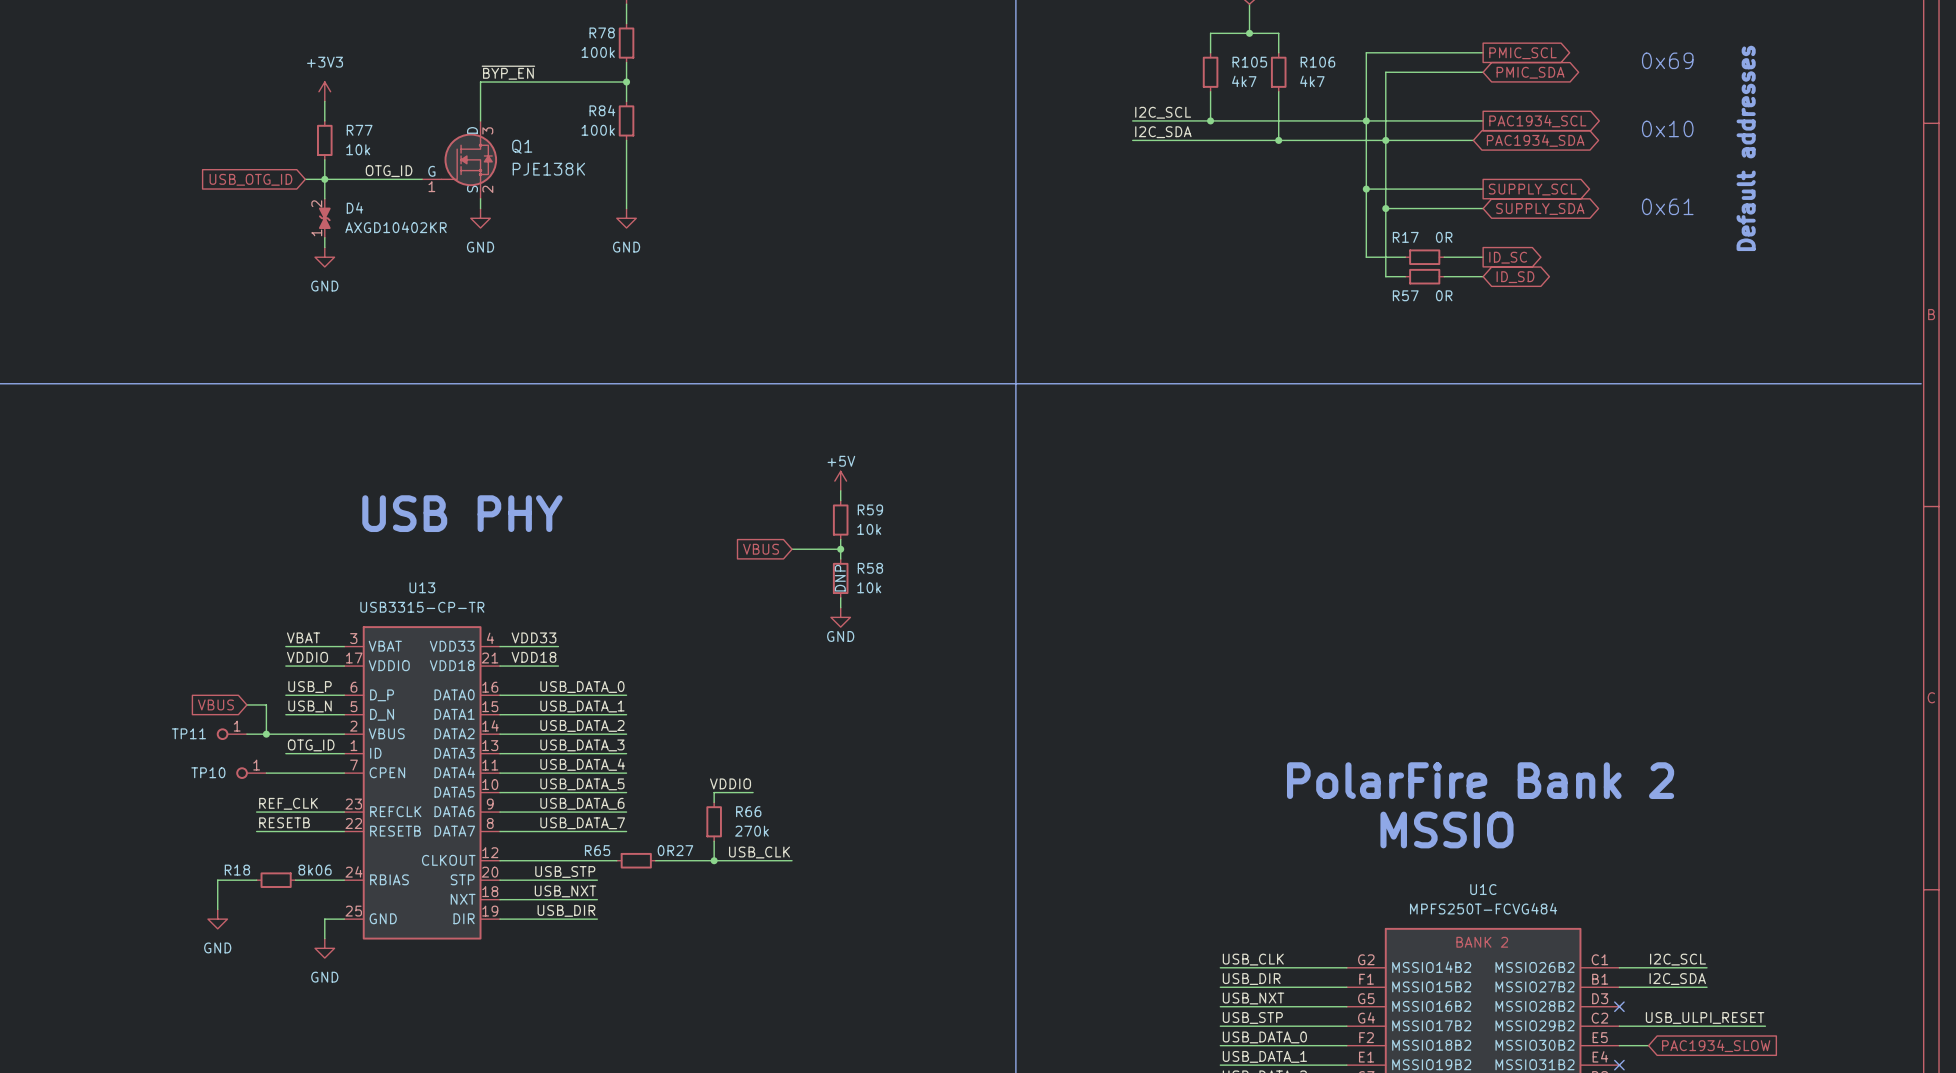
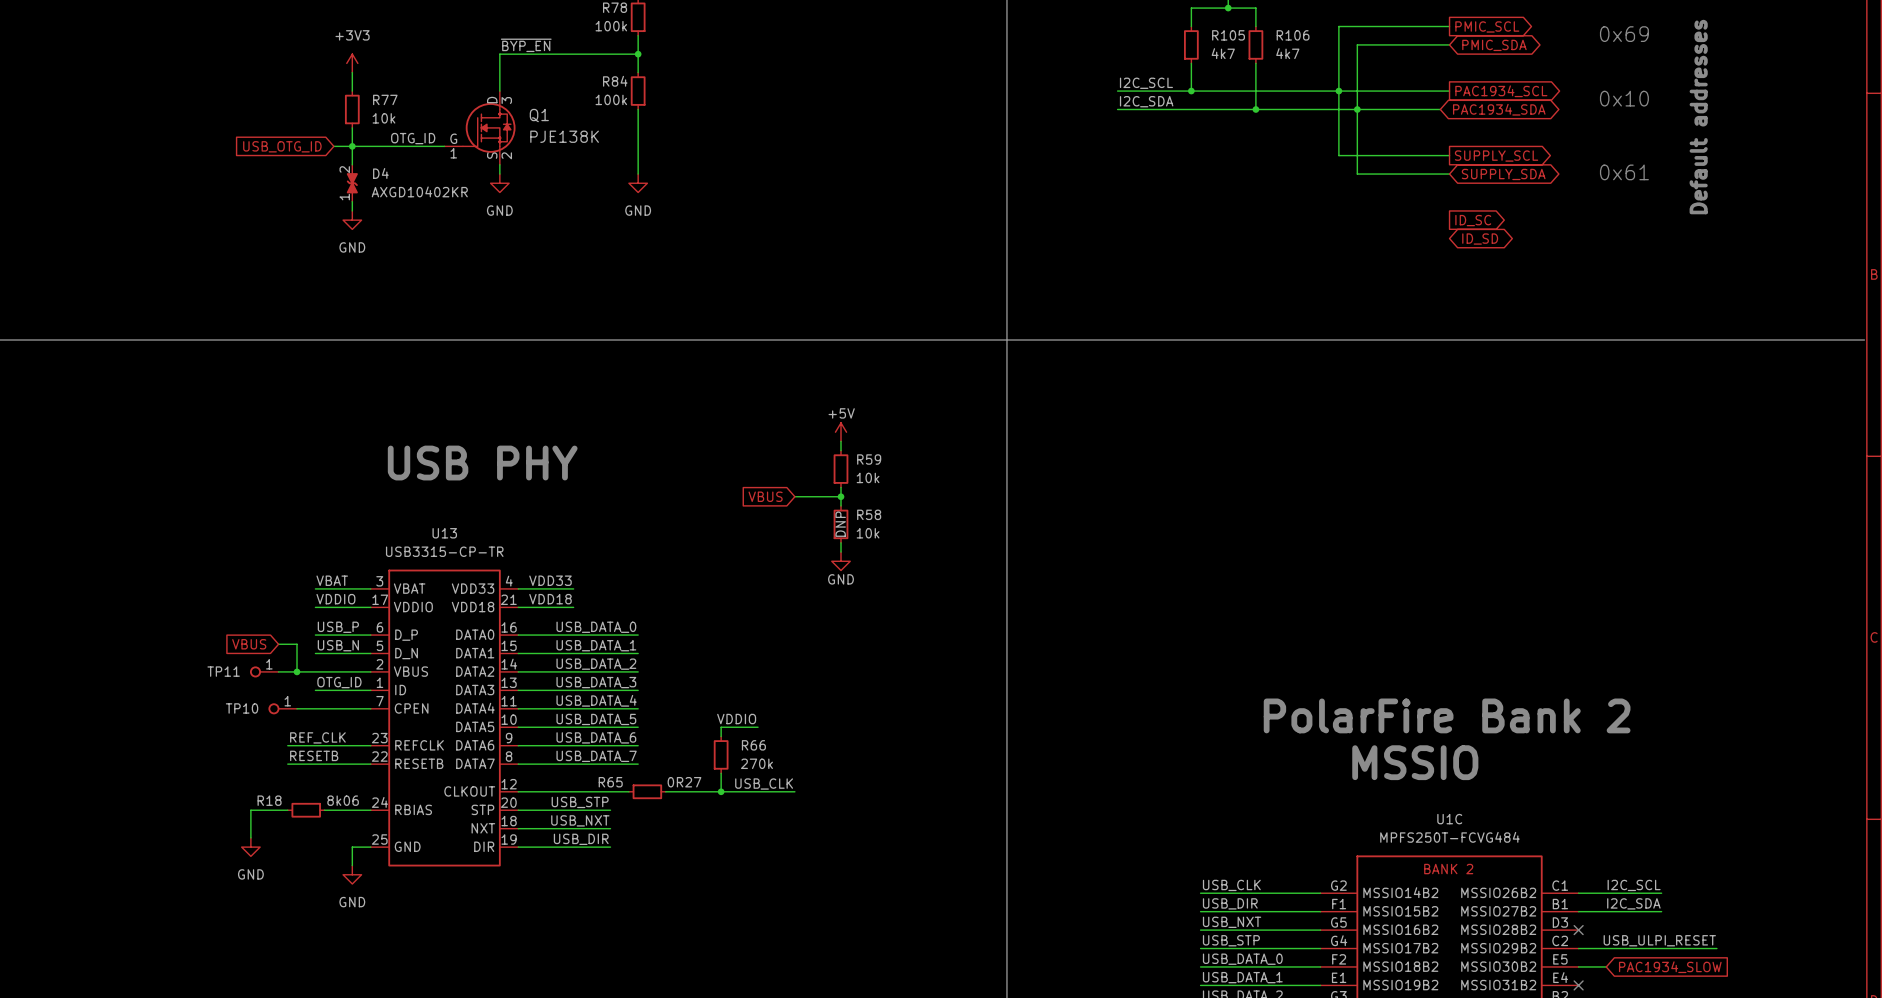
wire: (1366, 189) (1366, 257) (1405, 257) -> none
junction: (1366, 189) -> none
wire: (1385, 208) (1385, 276) (1405, 276) -> none
junction: (1385, 208) -> none
R17: (1424, 257) -> none
wire: (1444, 257) (1483, 257) -> none
R57: (1424, 276) -> none
wire: (1444, 276) (1483, 276) -> none

